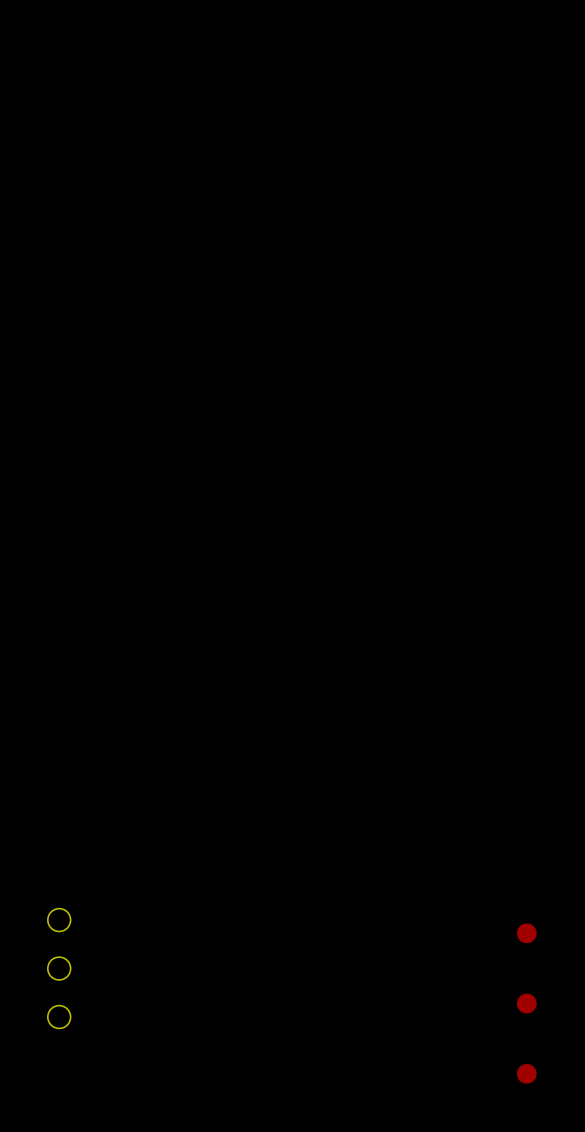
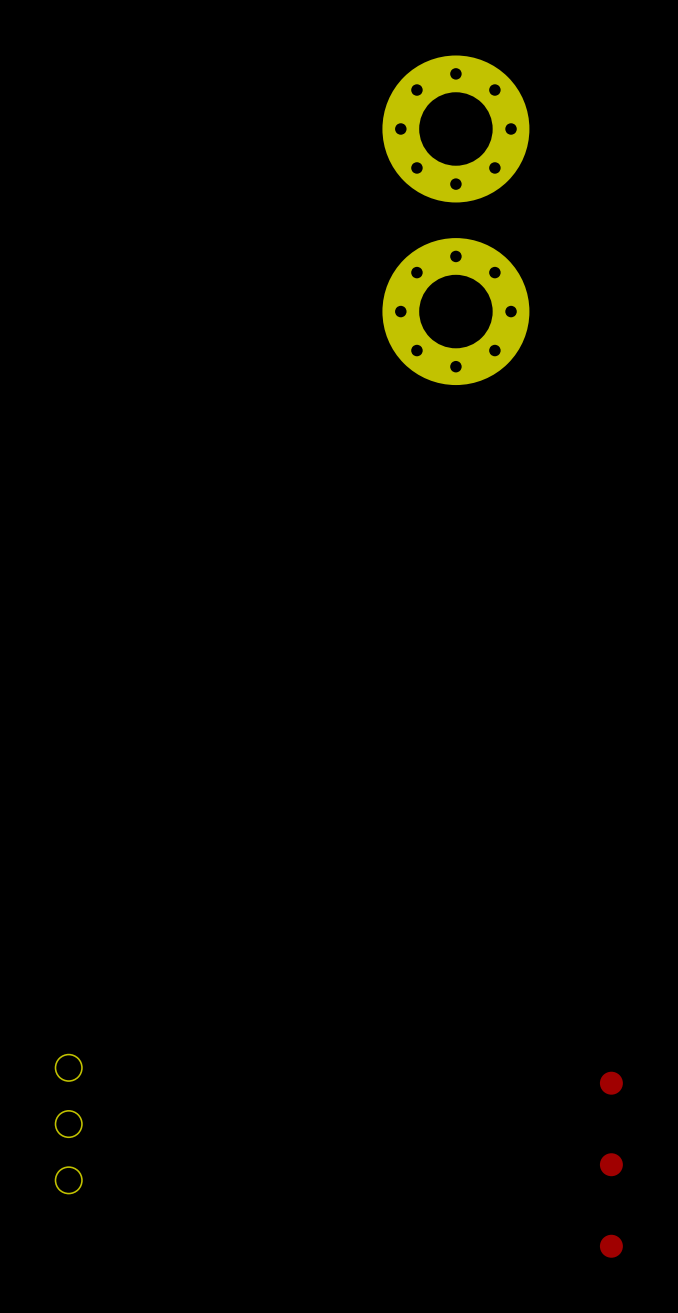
part: none -> (455, 128)
part: none -> (455, 311)

